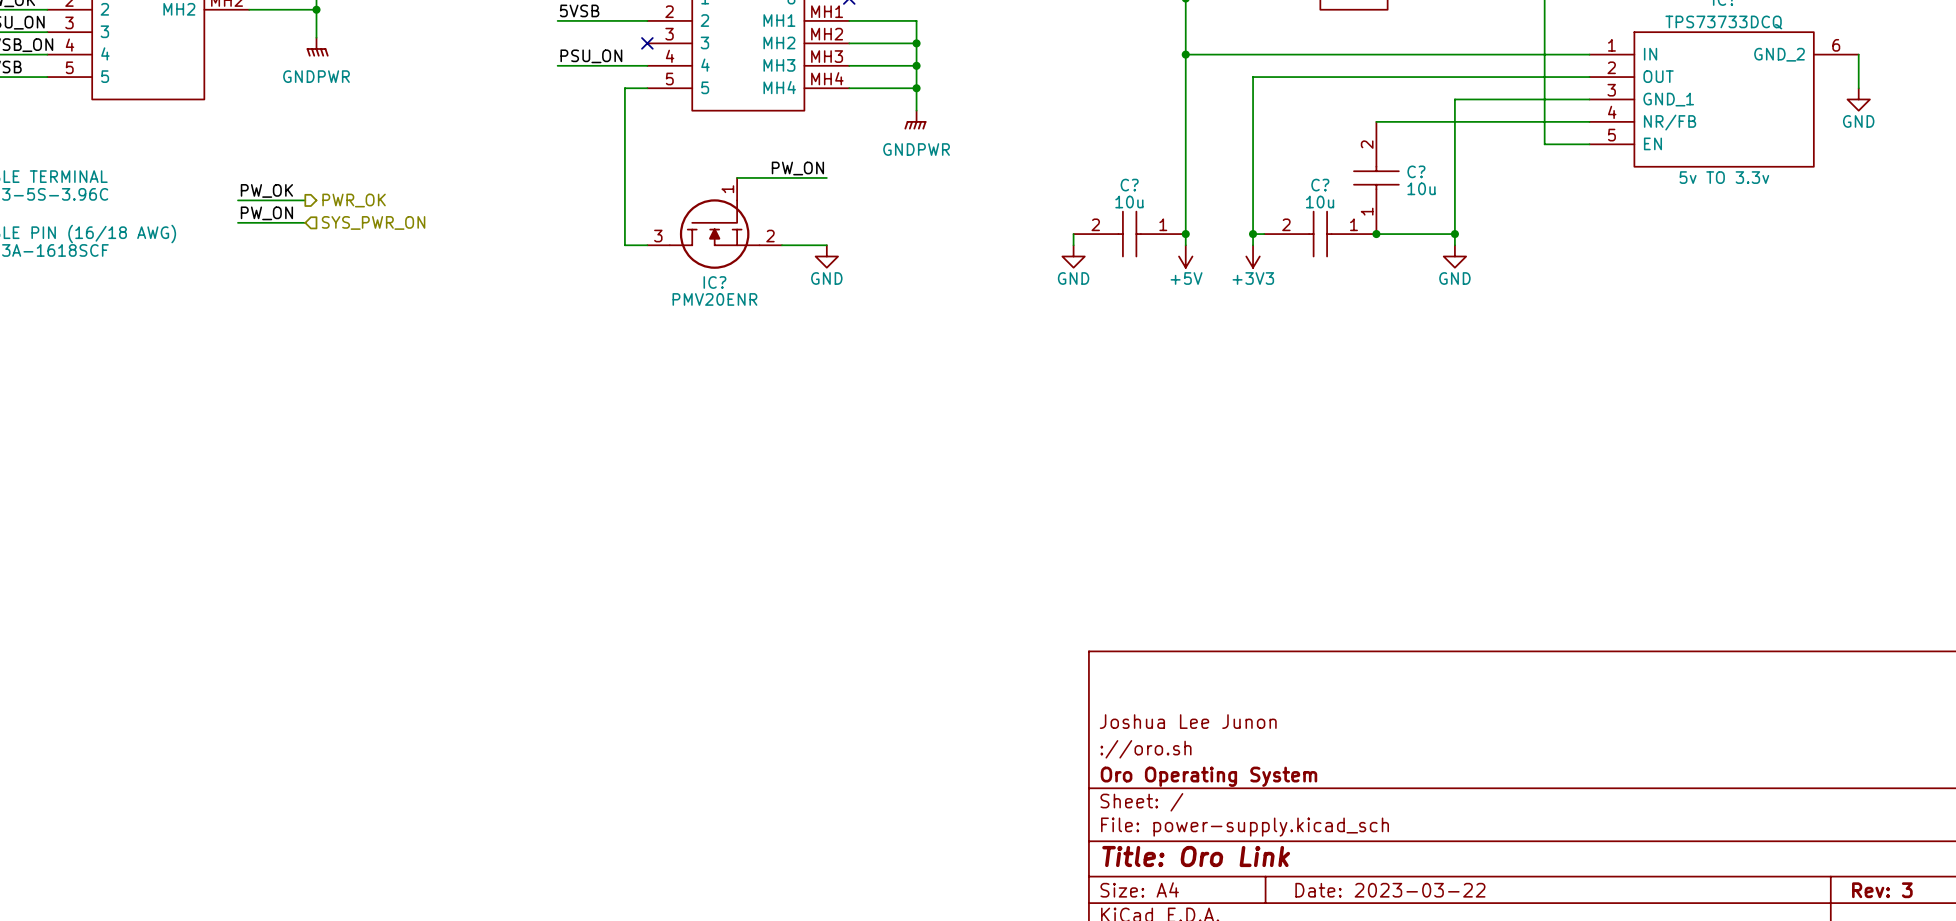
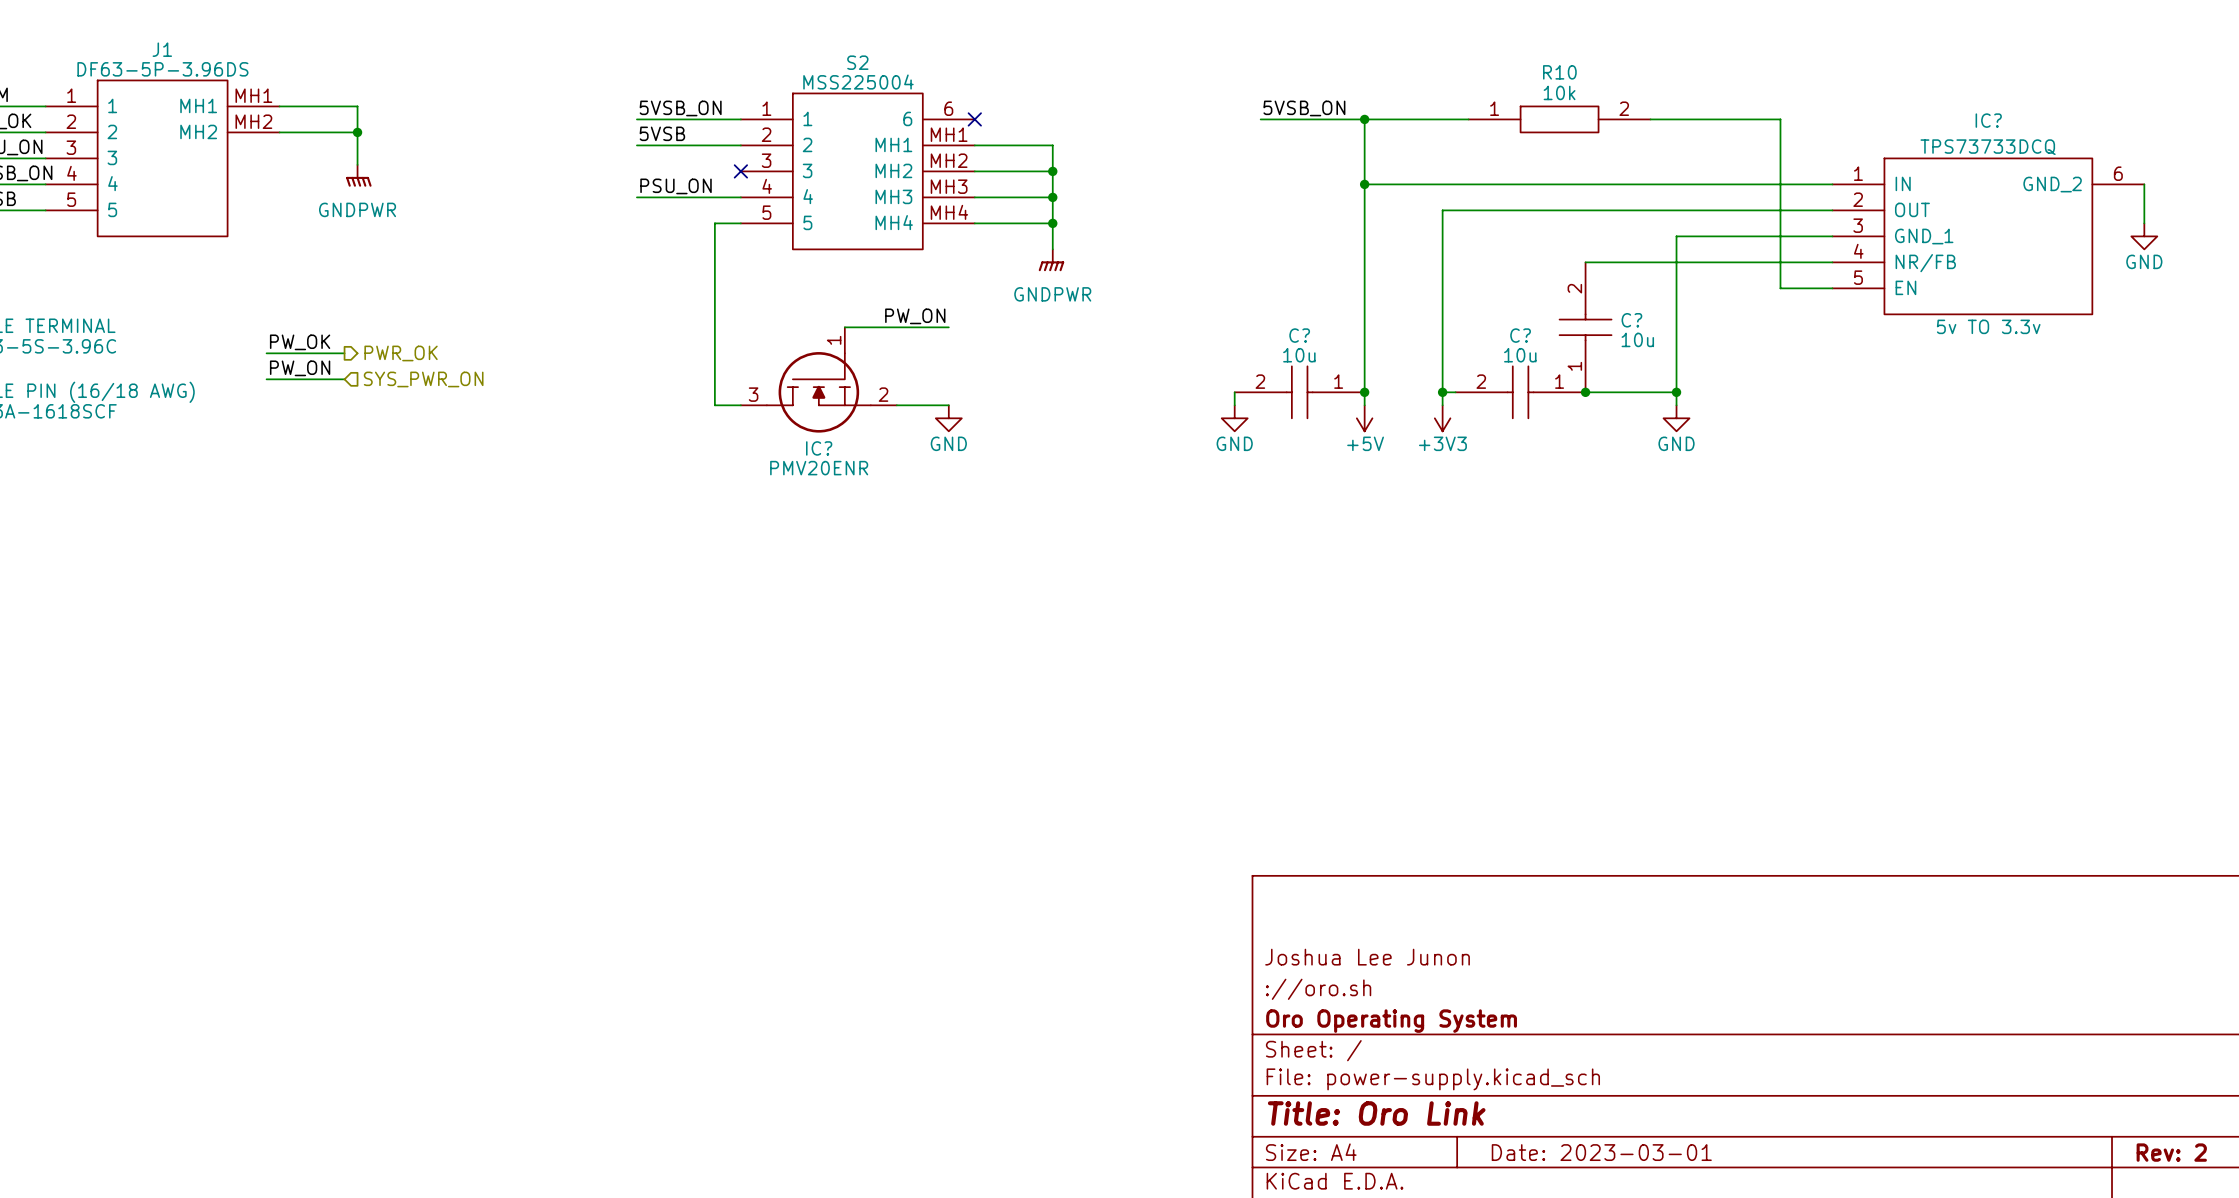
title block: Date: 2023-03-22 (1390, 890) -> Date: 2023-03-01 (1601, 1152)
title block: Rev: 3 (1882, 890) -> Rev: 2 (2171, 1152)

